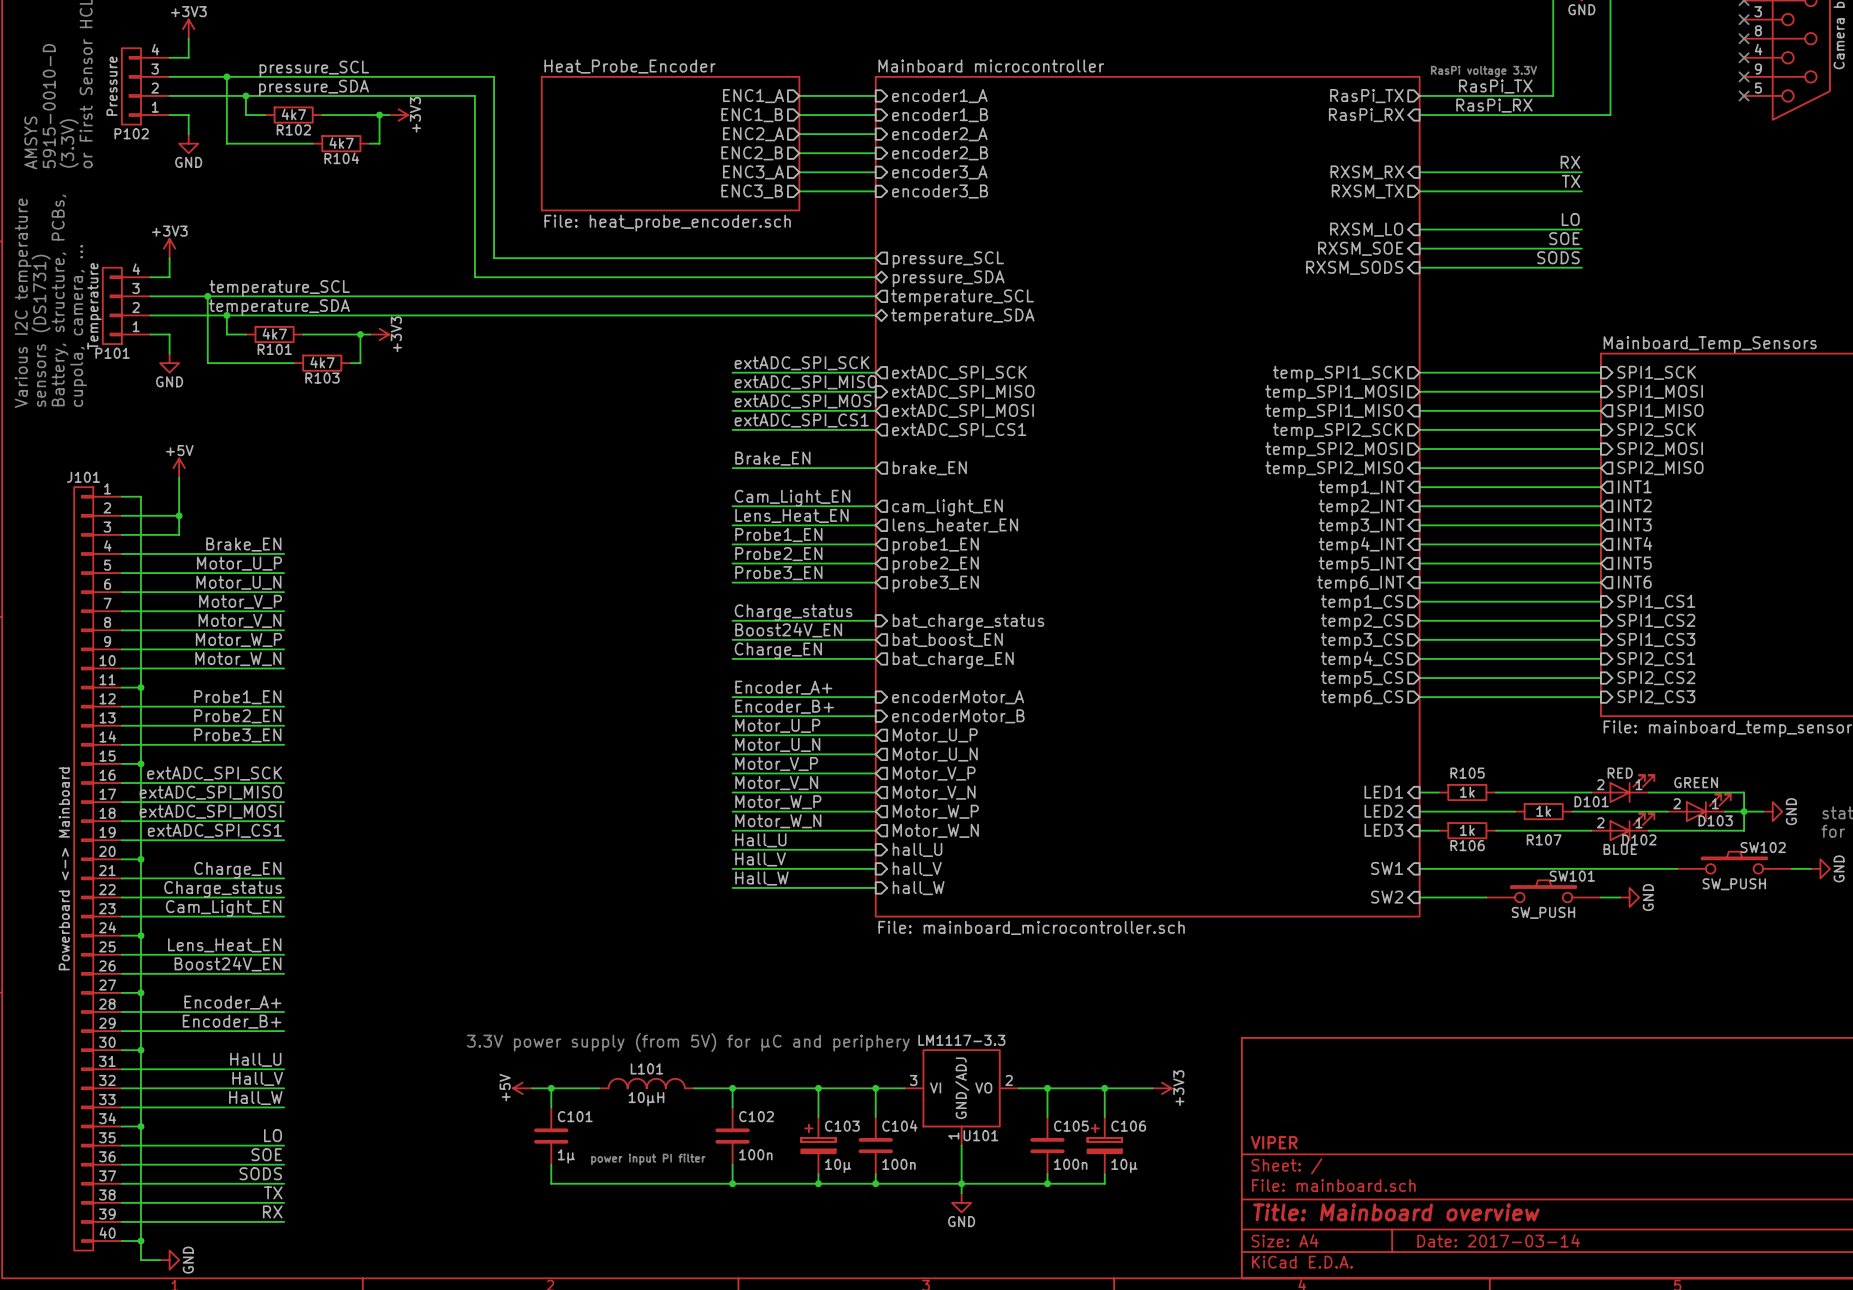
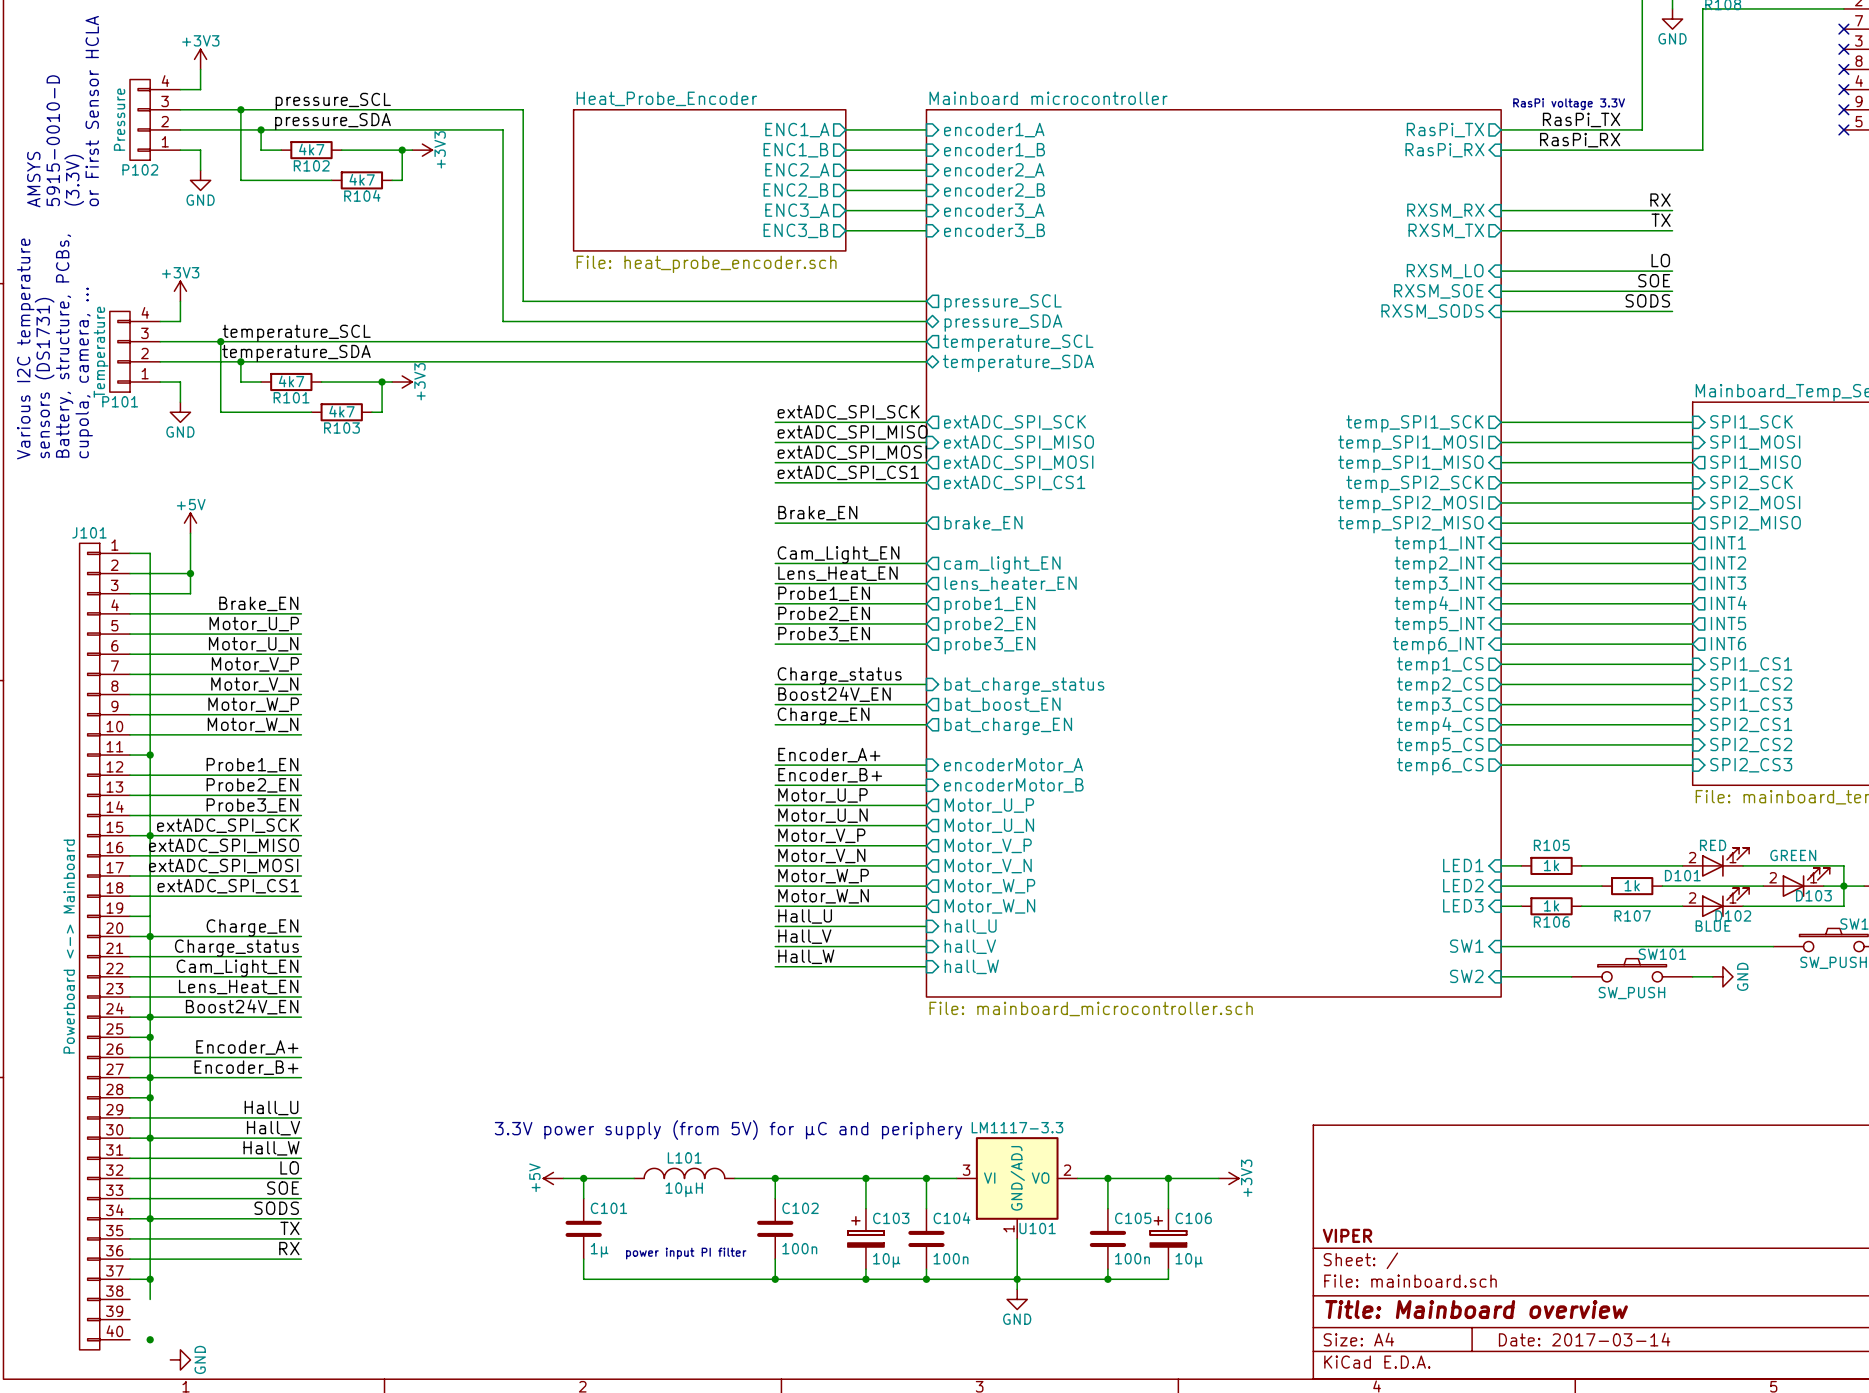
label: none -> extADC_SPI_SCK (228, 825)
label: extADC_SPI_SCK (214, 773) -> extADC_SPI_MISO (223, 845)
label: extADC_SPI_MISO (210, 792) -> extADC_SPI_MOSI (223, 866)
label: extADC_SPI_MOSI (210, 811) -> extADC_SPI_CS1 (228, 886)
label: extADC_SPI_CS1 (214, 830) -> none
wire: (140, 840) (284, 840) -> (150, 835) (301, 835)
label: none -> Charge_EN (252, 927)
wire: none -> (150, 936) (301, 936)
label: Charge_EN (237, 870) -> Charge_status (236, 948)
label: Charge_status (223, 889) -> Cam_Light_EN (237, 968)
label: Cam_Light_EN (223, 908) -> Lens_Heat_EN (238, 987)
label: none -> Boost24V_EN (242, 1006)
label: Lens_Heat_EN (224, 945) -> none
wire: (140, 954) (284, 954) -> (150, 1017) (301, 1017)
junction: none -> (150, 1037)
label: Boost24V_EN (228, 964) -> Encoder_A+ (247, 1047)
label: Encoder_A+ (232, 1002) -> Encoder_B+ (246, 1067)
wire: (140, 1012) (284, 1012) -> (150, 1077) (301, 1077)
junction: none -> (150, 1097)
label: Encoder_B+ (232, 1021) -> Hall_U (271, 1107)
label: none -> Hall_V (273, 1128)
wire: none -> (150, 1138) (301, 1138)
label: Hall_U (255, 1059) -> Hall_W (271, 1148)
label: Hall_V (257, 1078) -> LO (289, 1167)
label: Hall_W (255, 1097) -> SOE (283, 1188)
label: LO (273, 1135) -> TX (289, 1228)
label: SOE (266, 1154) -> RX (289, 1248)
label position: SODS (260, 1173) -> SODS (276, 1208)
wire: (140, 1183) (284, 1183) -> (150, 1218) (301, 1218)
junction: none -> (150, 1279)
label: TX (273, 1192) -> none
wire: (121, 1202) (284, 1202) -> none
wire: (140, 1202) (140, 1260) (160, 1260) -> none
label: RX (272, 1211) -> none
wire: (121, 1221) (284, 1221) -> none
wire: (121, 1241) (140, 1241) -> none

